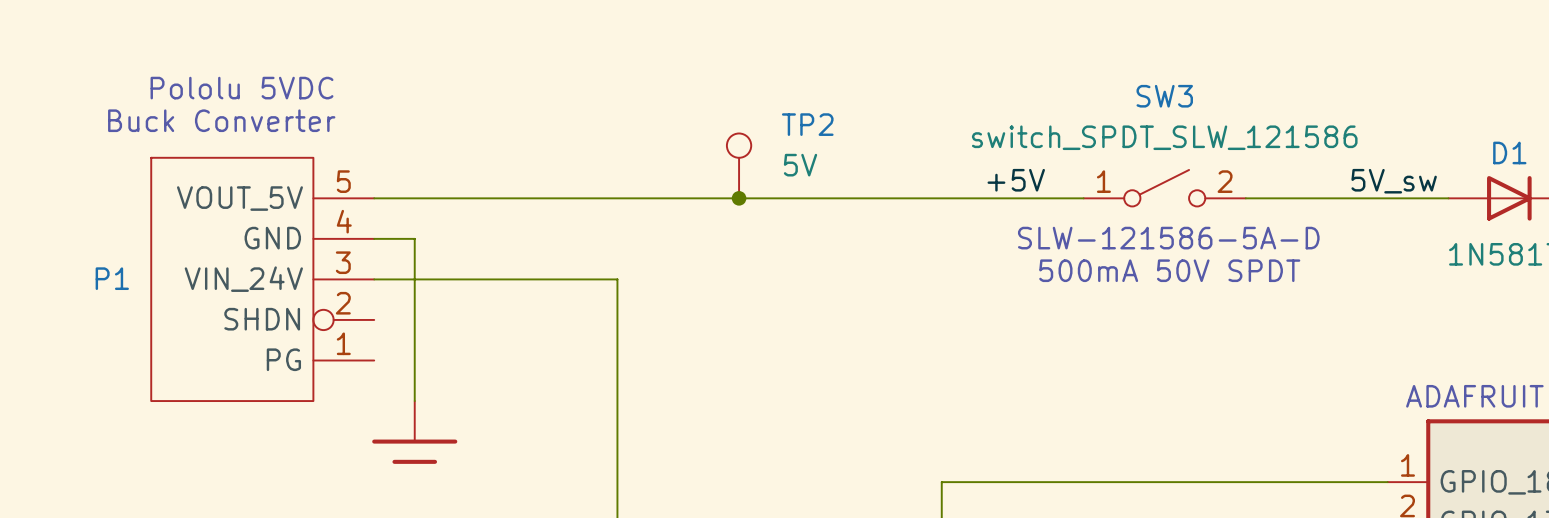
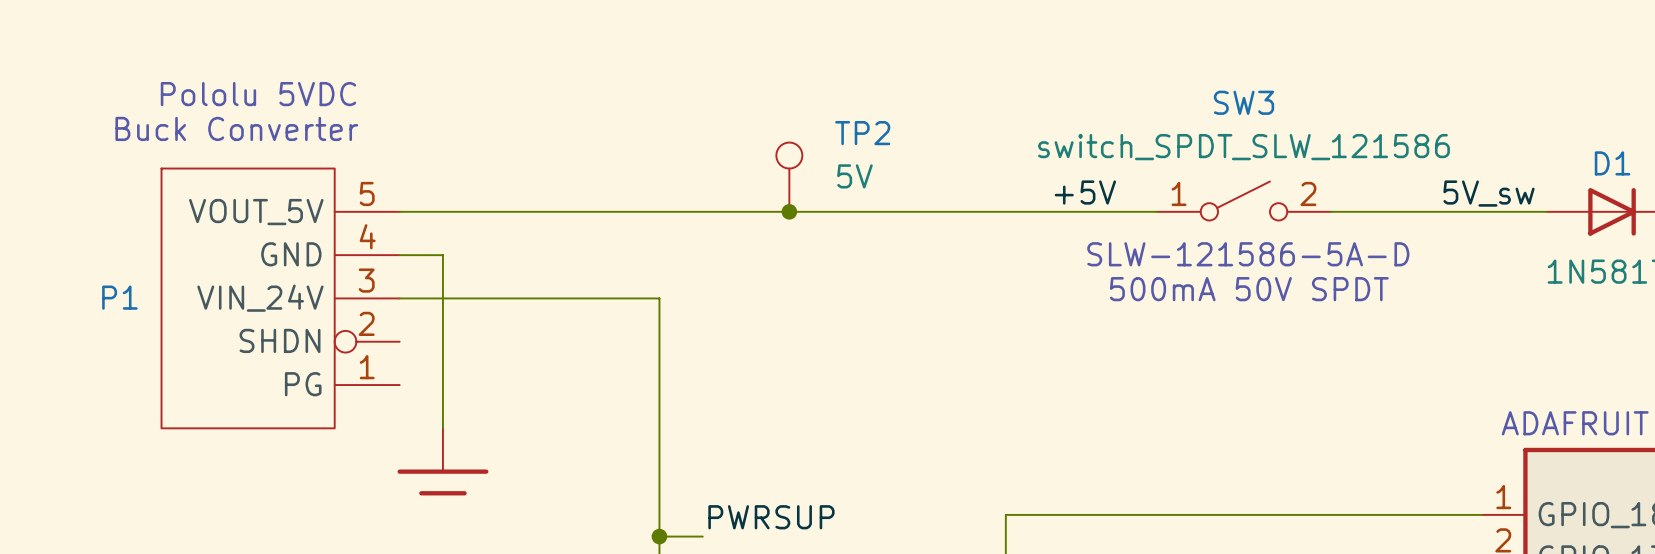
label: none -> PWRSUP (771, 517)
wire: none -> (659, 536) (702, 536)
junction: none -> (659, 536)

